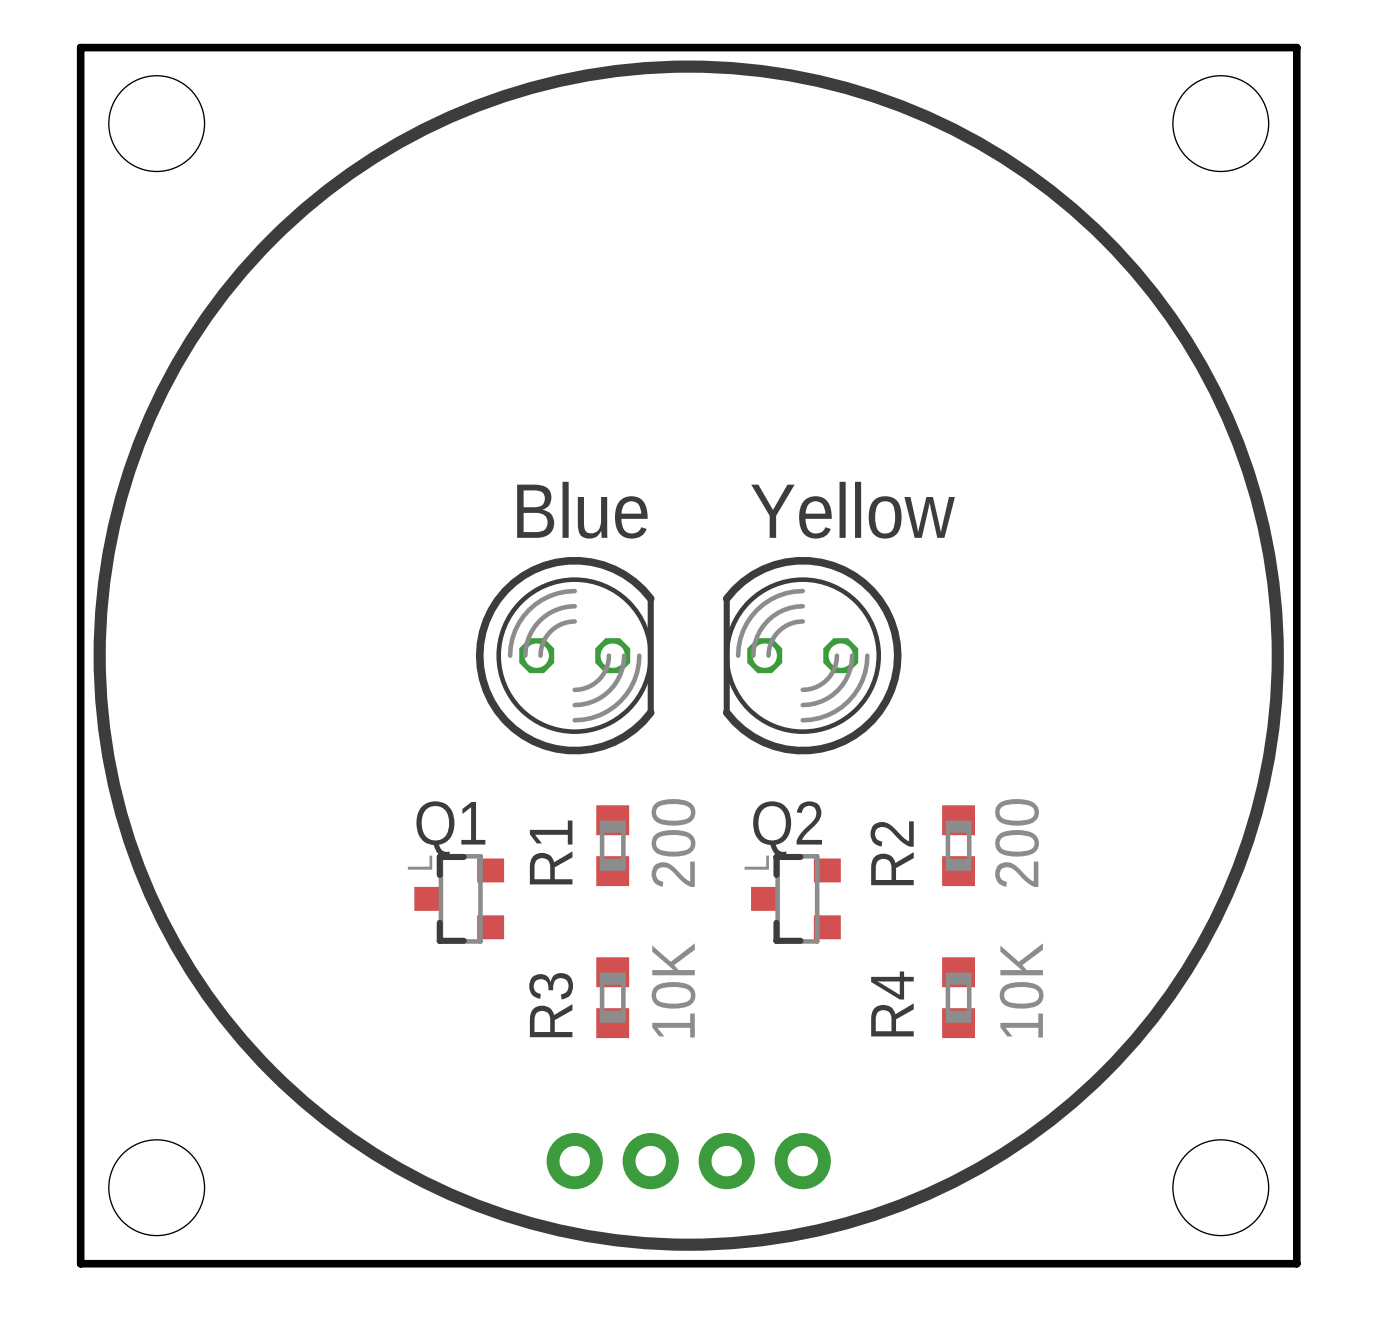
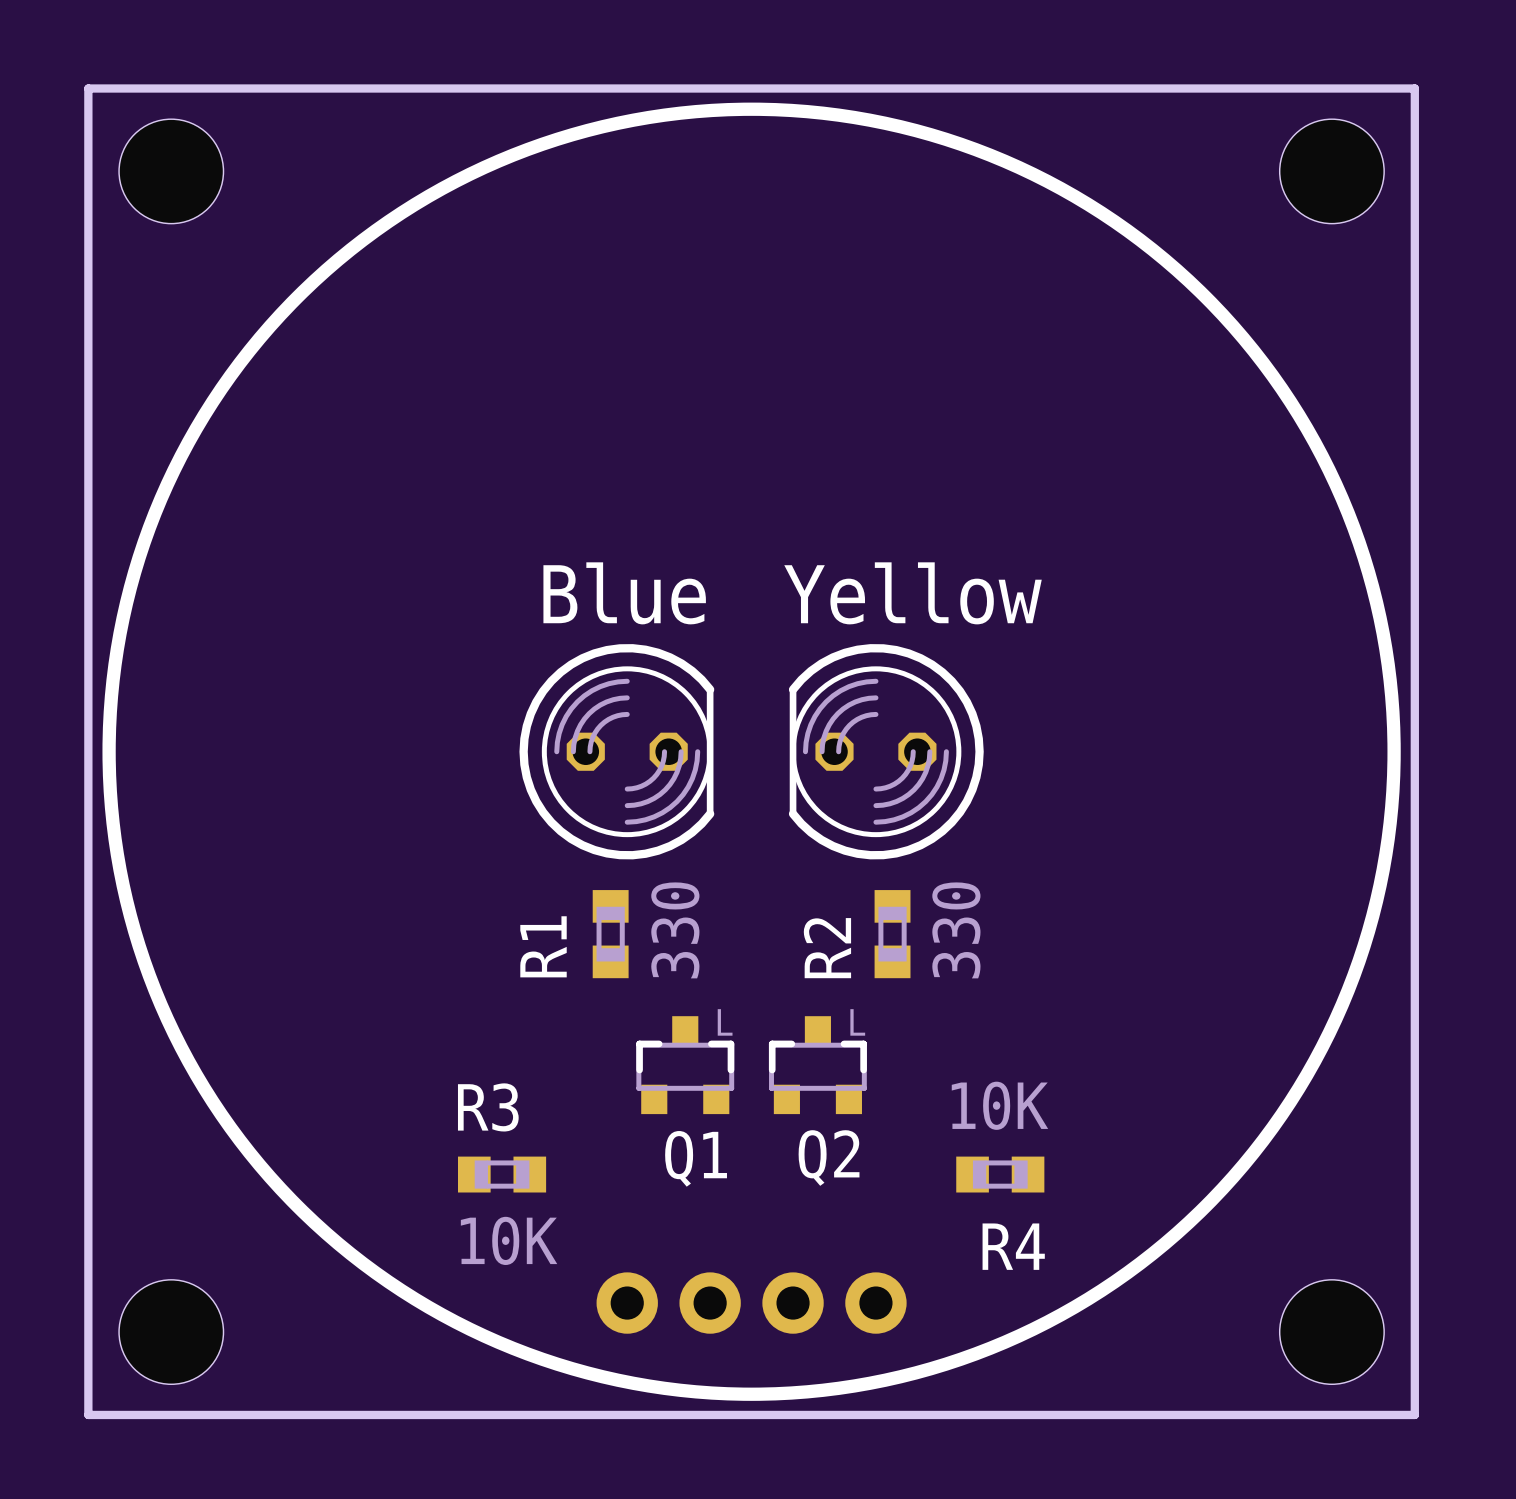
Q1 name position: Q1 (450, 828) -> Q1 (696, 1158)
Q2 name position: Q2 (787, 828) -> Q2 (829, 1158)
R1 value: 200 (673, 843) -> 330 (675, 930)
R2 value: 200 (1017, 843) -> 330 (956, 930)
R1 position: (612, 845) -> (610, 934)
R2 position: (958, 845) -> (892, 934)
R2 name position: R2 (892, 853) -> R2 (827, 948)
Q1 rotation: 0° (459, 898) -> 90° clockwise (685, 1065)
Q1 position: (459, 898) -> (685, 1065)
Q2 rotation: 0° (795, 898) -> 90° clockwise (817, 1065)
Q2 position: (795, 898) -> (817, 1065)
R4 value position: 10K (1021, 990) -> 10K (999, 1105)
R3 rotation: 0° (612, 997) -> 90° clockwise (502, 1174)
R3 position: (612, 997) -> (502, 1174)
R4 rotation: 0° (958, 997) -> 90° clockwise (1000, 1174)
R4 position: (958, 997) -> (1000, 1174)
R4 name position: R4 (892, 1003) -> R4 (1013, 1246)

